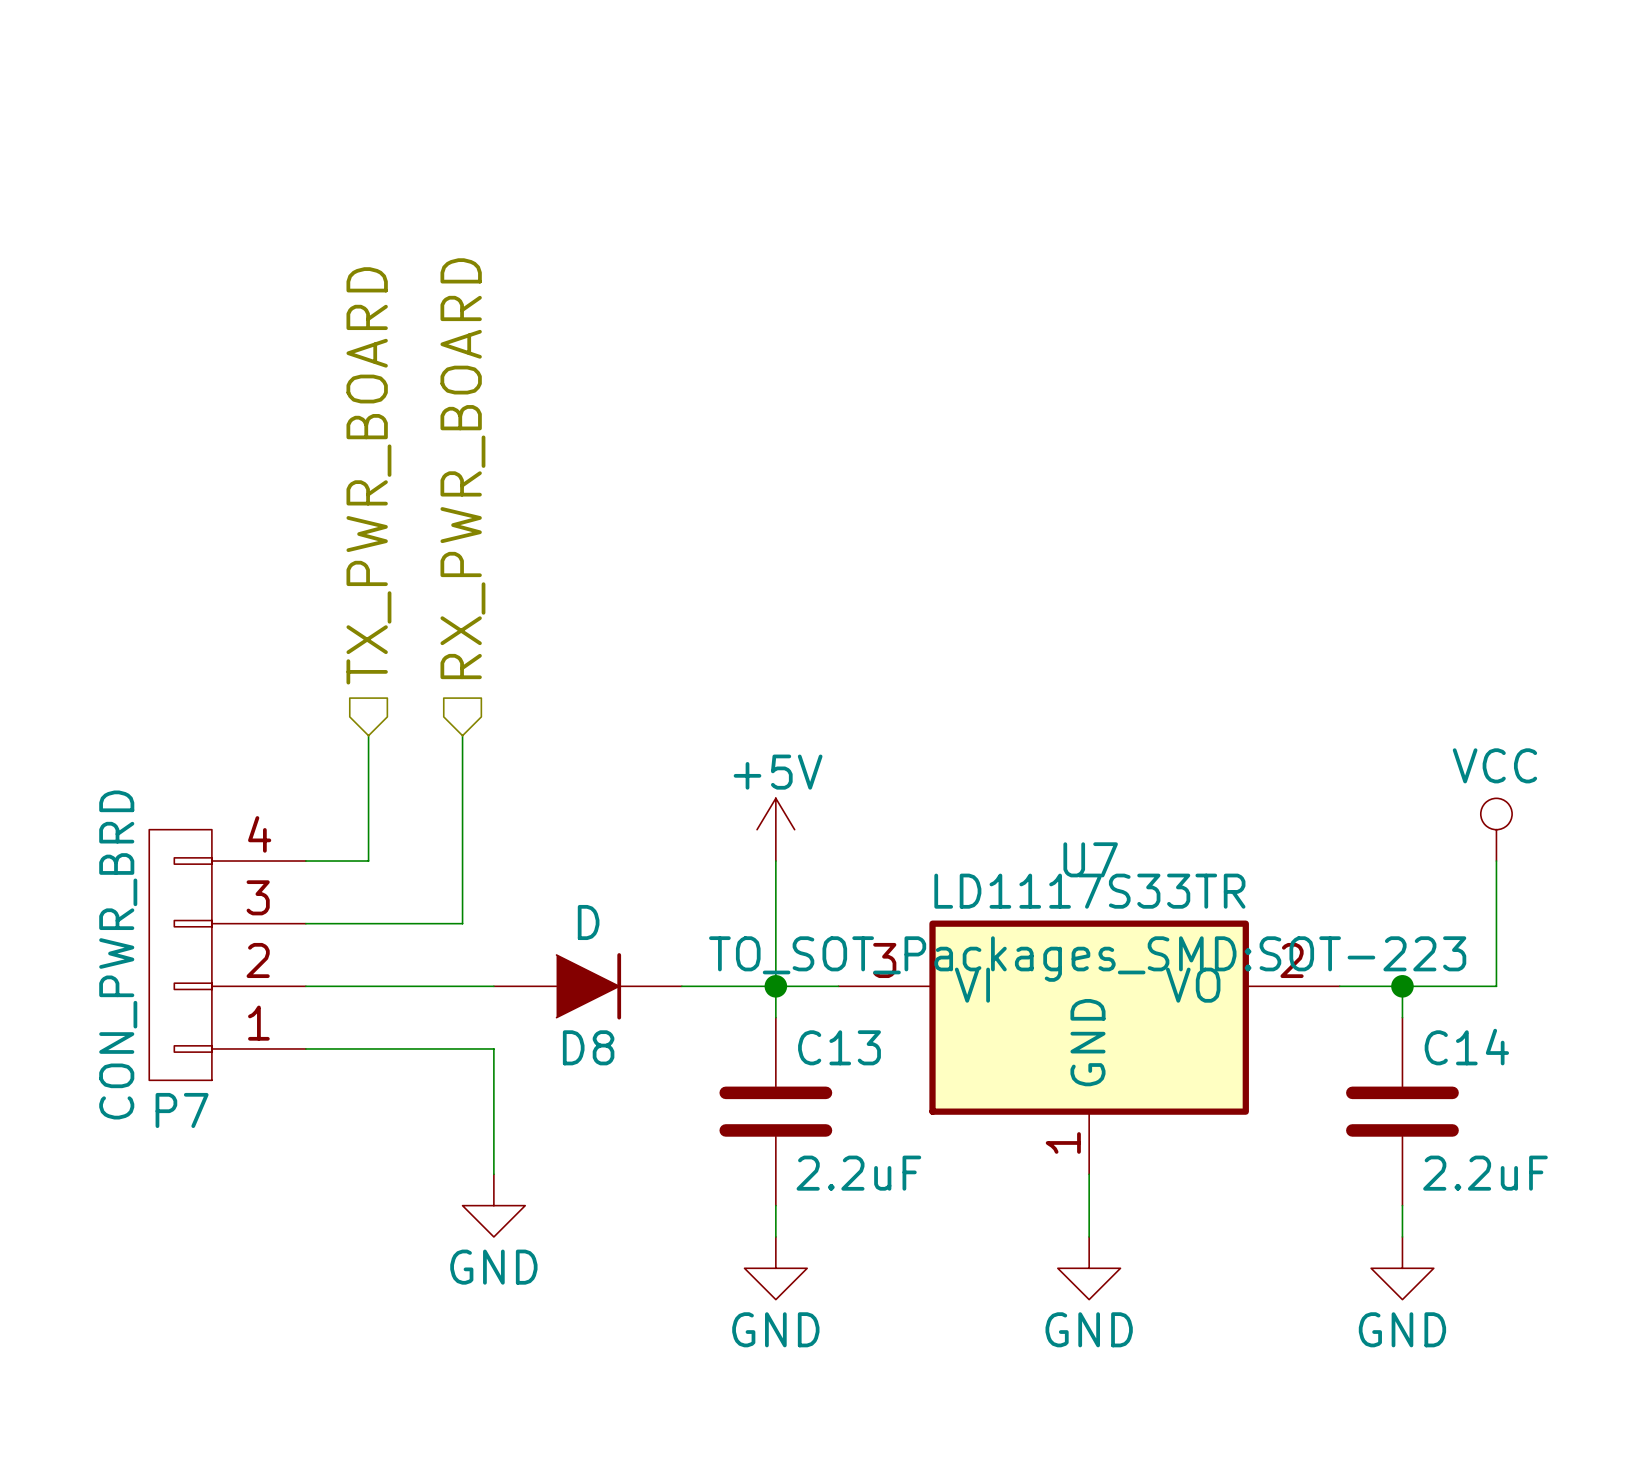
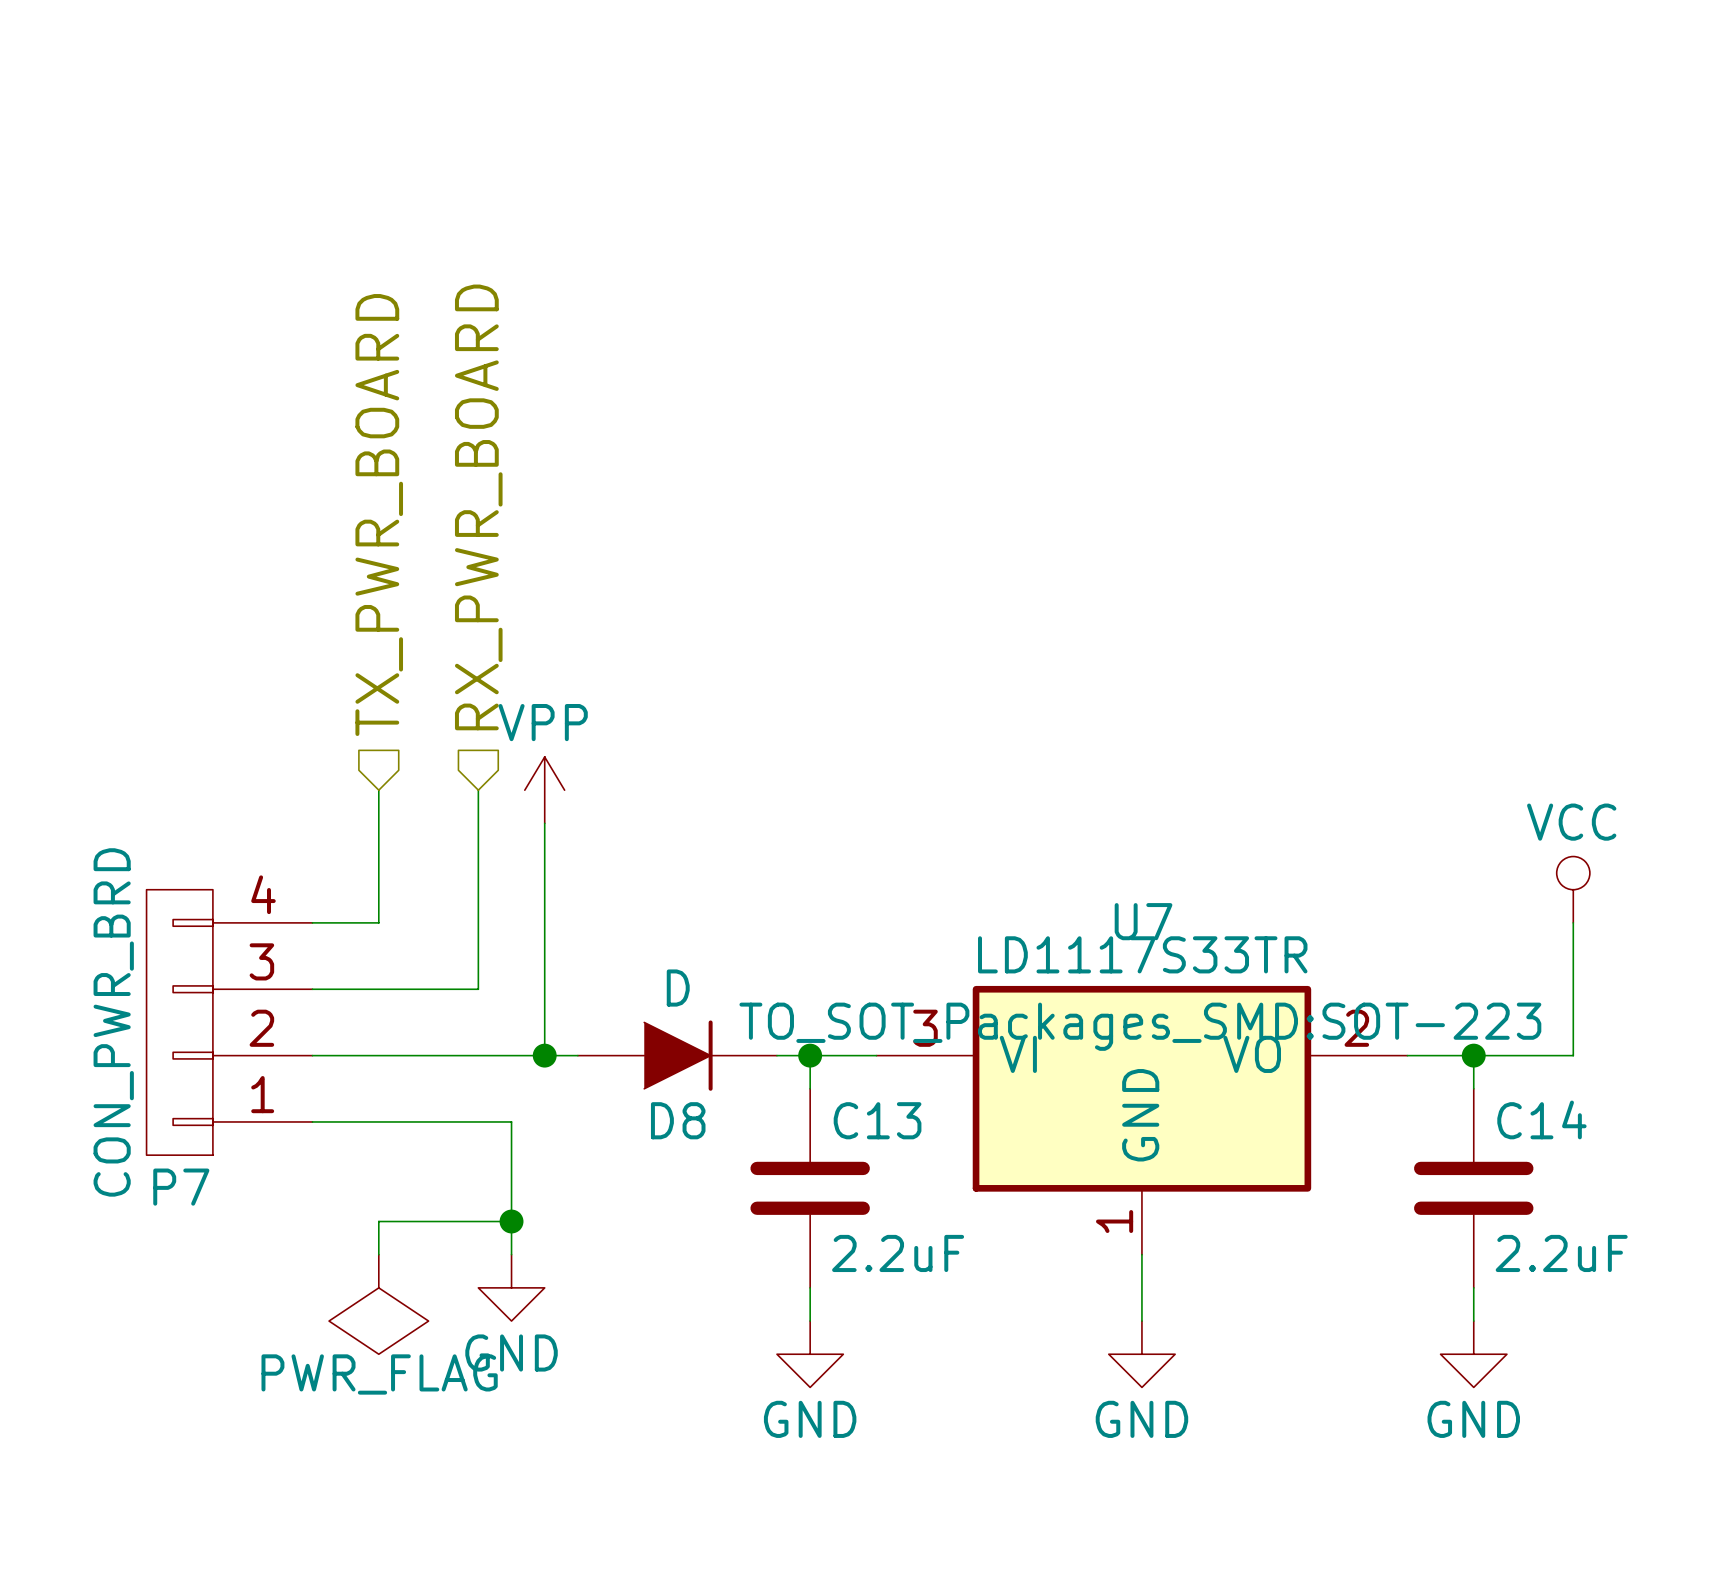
power symbol: none -> VPP (544, 790)
wire: none -> (544, 823) (544, 1055)
power symbol: +5V (775, 829) -> none
wire: (775, 861) (775, 986) -> none
junction: none -> (544, 1055)
D8 position: (587, 986) -> (677, 1055)
wire: none -> (511, 1221) (378, 1221) (378, 1254)
junction: none -> (511, 1221)
power symbol: none -> PWR_FLAG (378, 1304)

